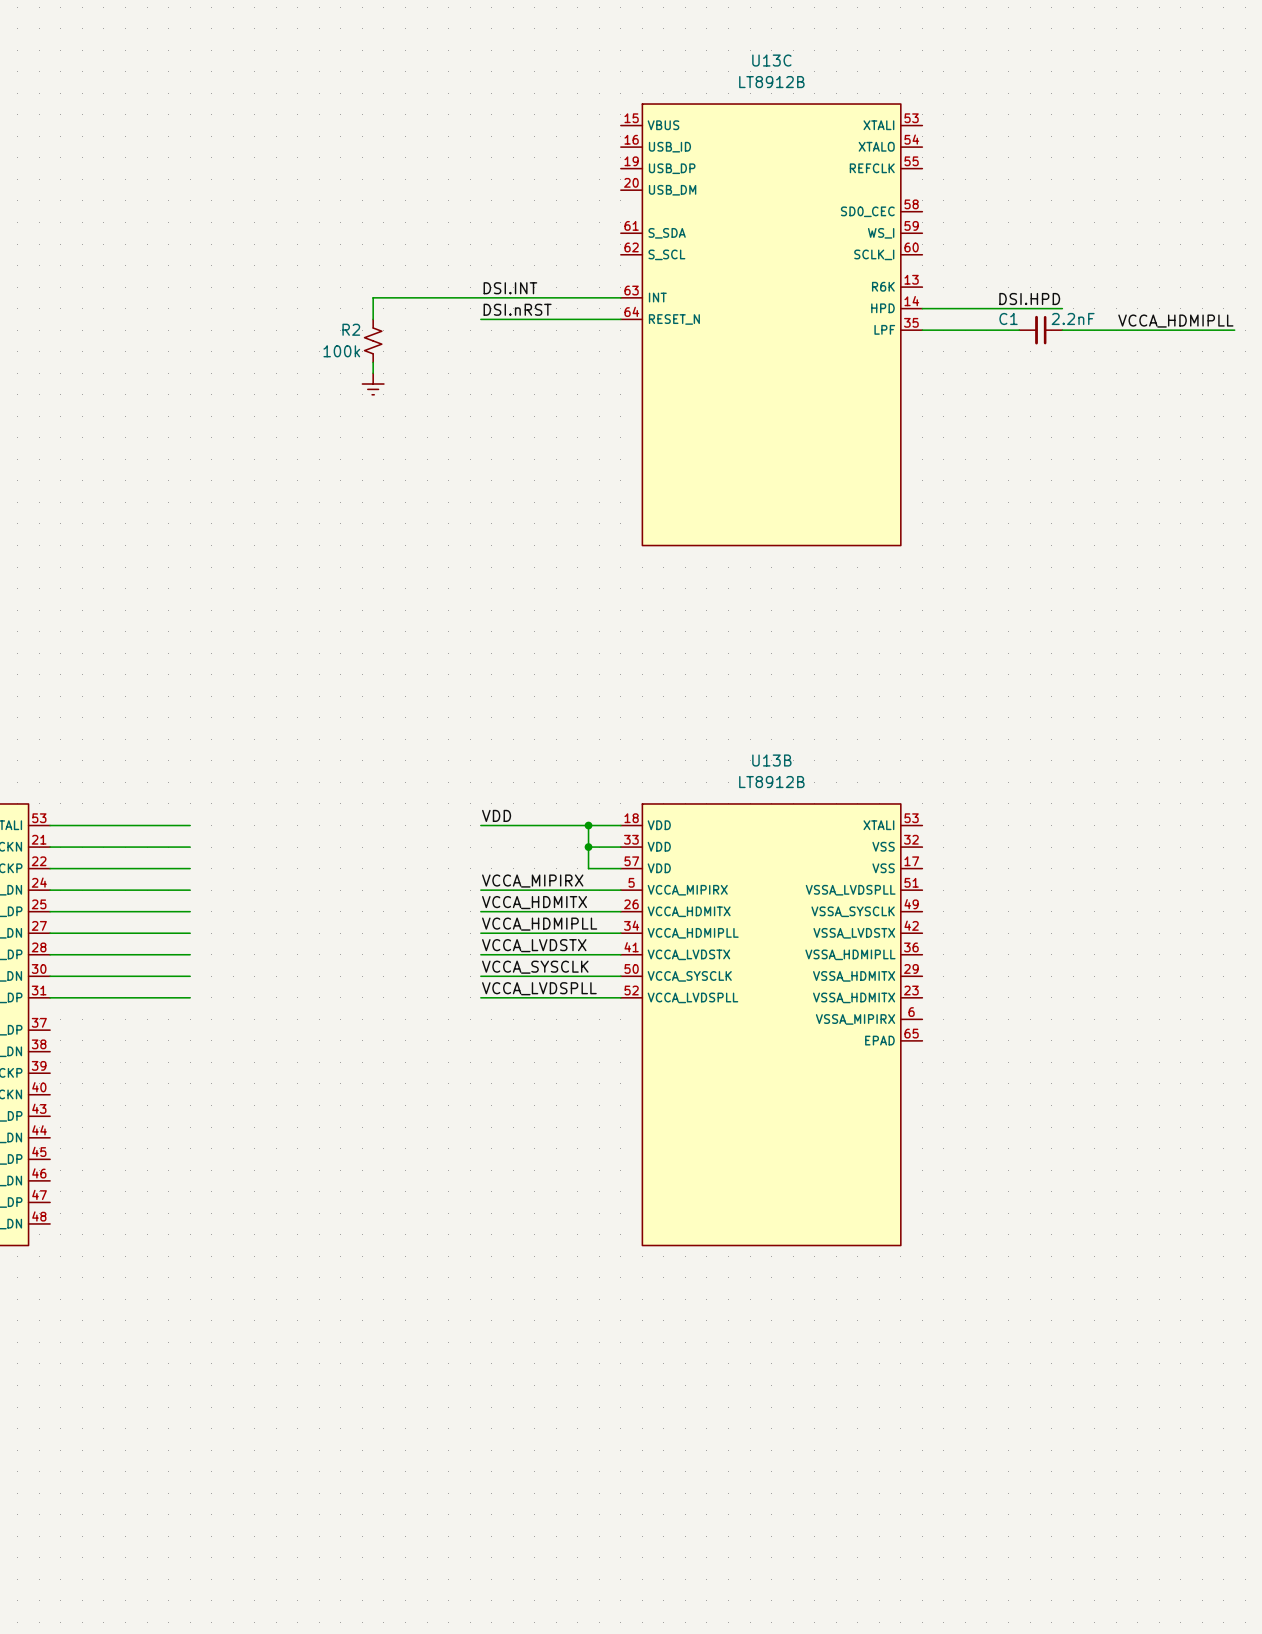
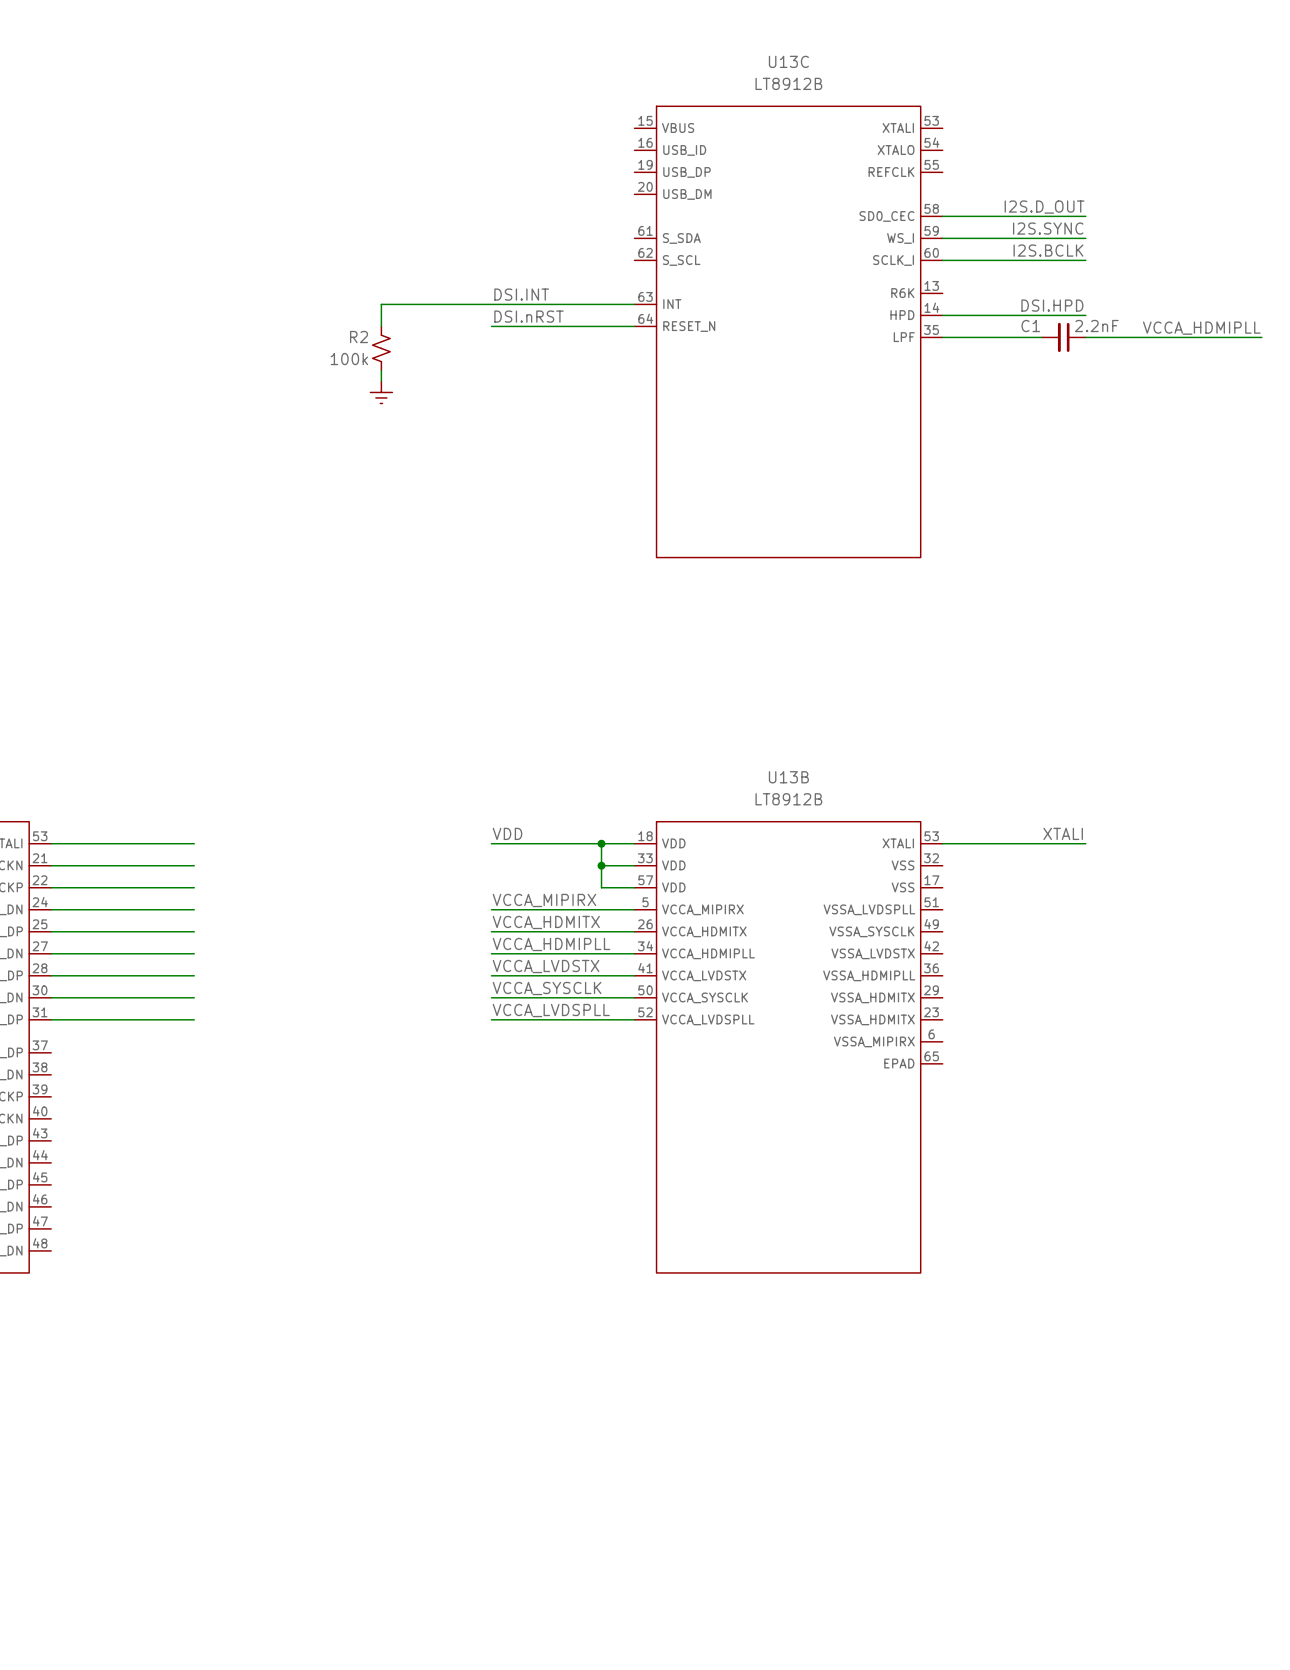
label: none -> I2S.D_OUT (1044, 207)
wire: none -> (942, 216) (1085, 216)
label: none -> I2S.SYNC (1048, 228)
wire: none -> (942, 238) (1085, 238)
label: none -> I2S.BCLK (1048, 250)
wire: none -> (942, 260) (1085, 260)
label: none -> XTALI (1063, 833)
wire: none -> (942, 843) (1085, 843)

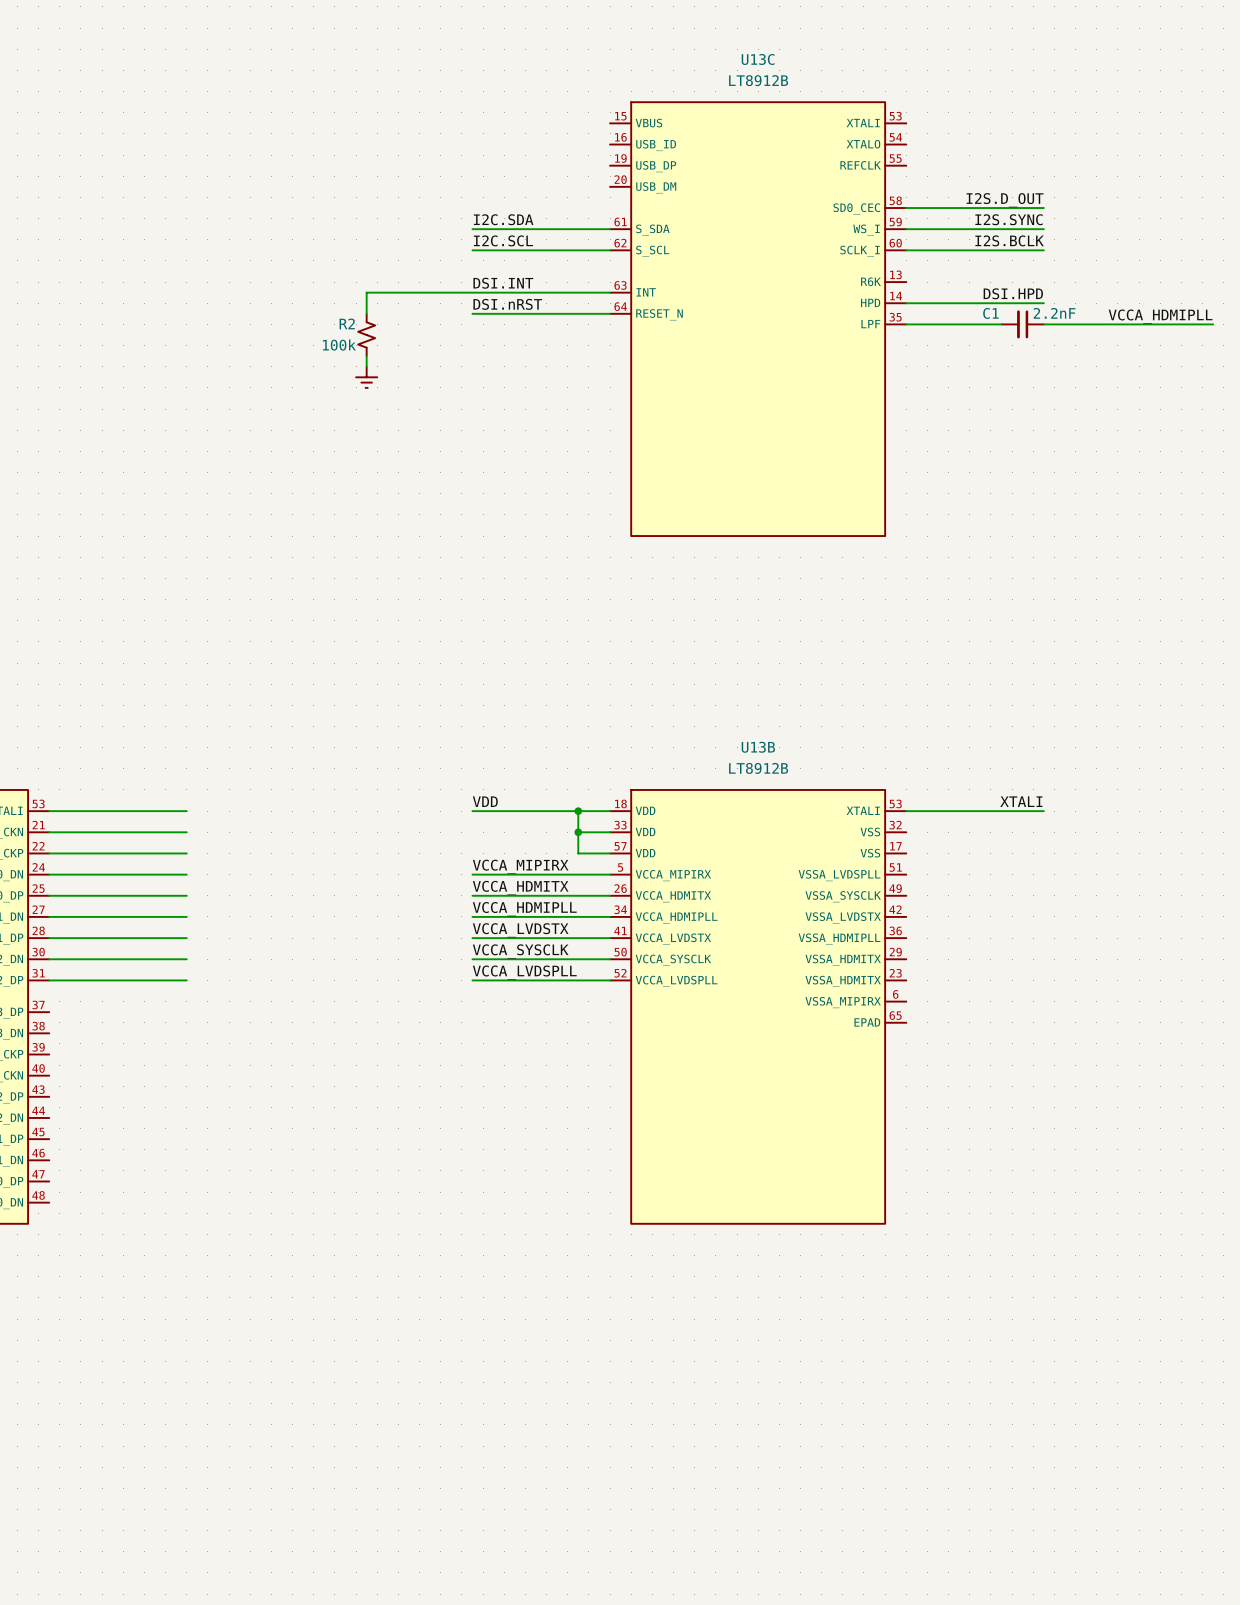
label: none -> I2C.SDA (503, 219)
wire: none -> (472, 229) (610, 229)
label: none -> I2C.SCL (503, 240)
wire: none -> (472, 250) (610, 250)

